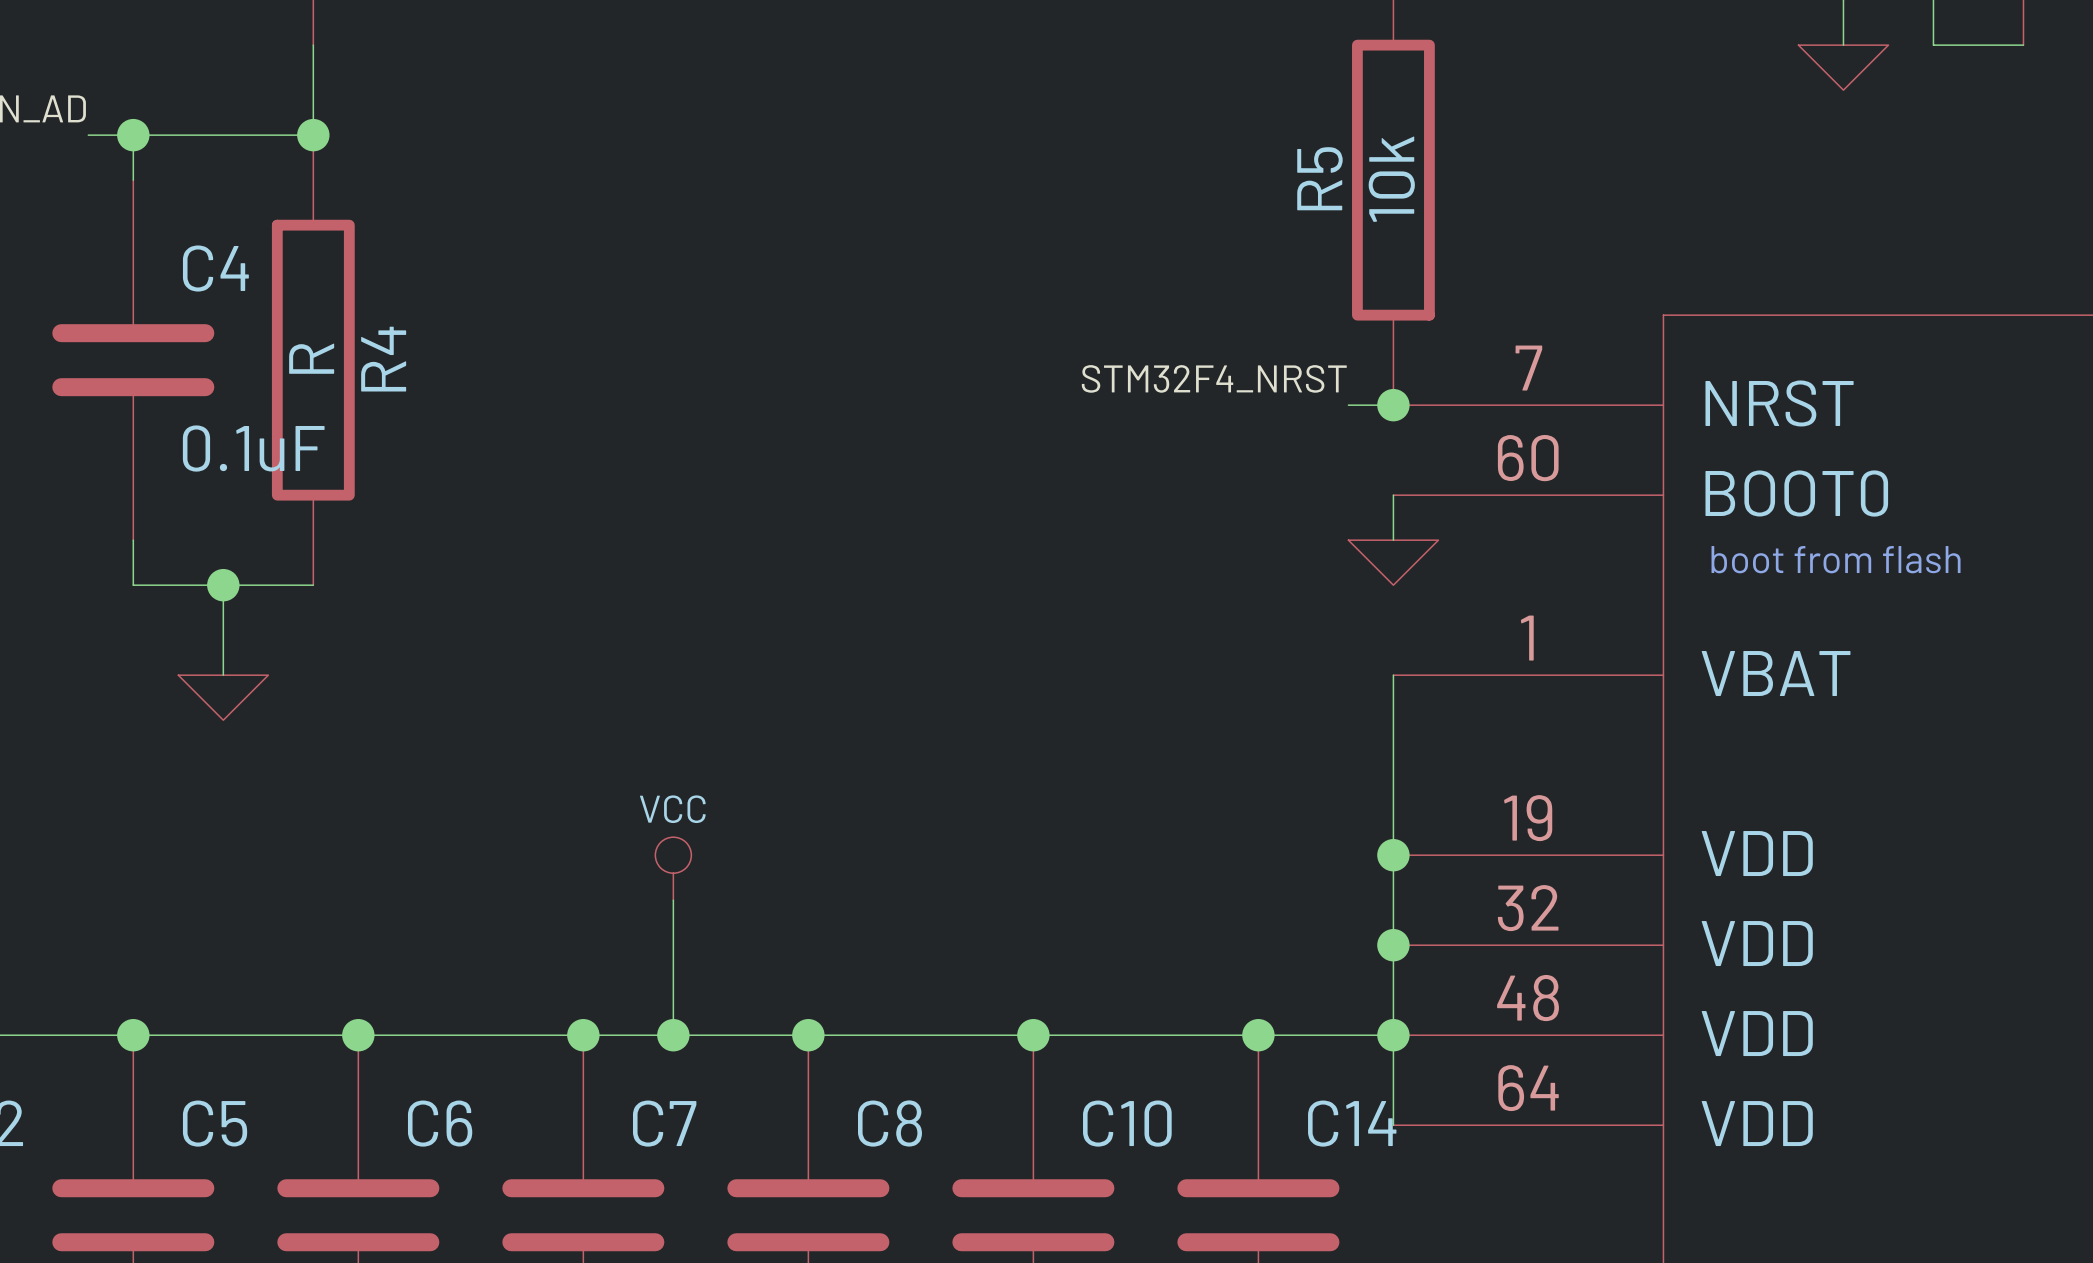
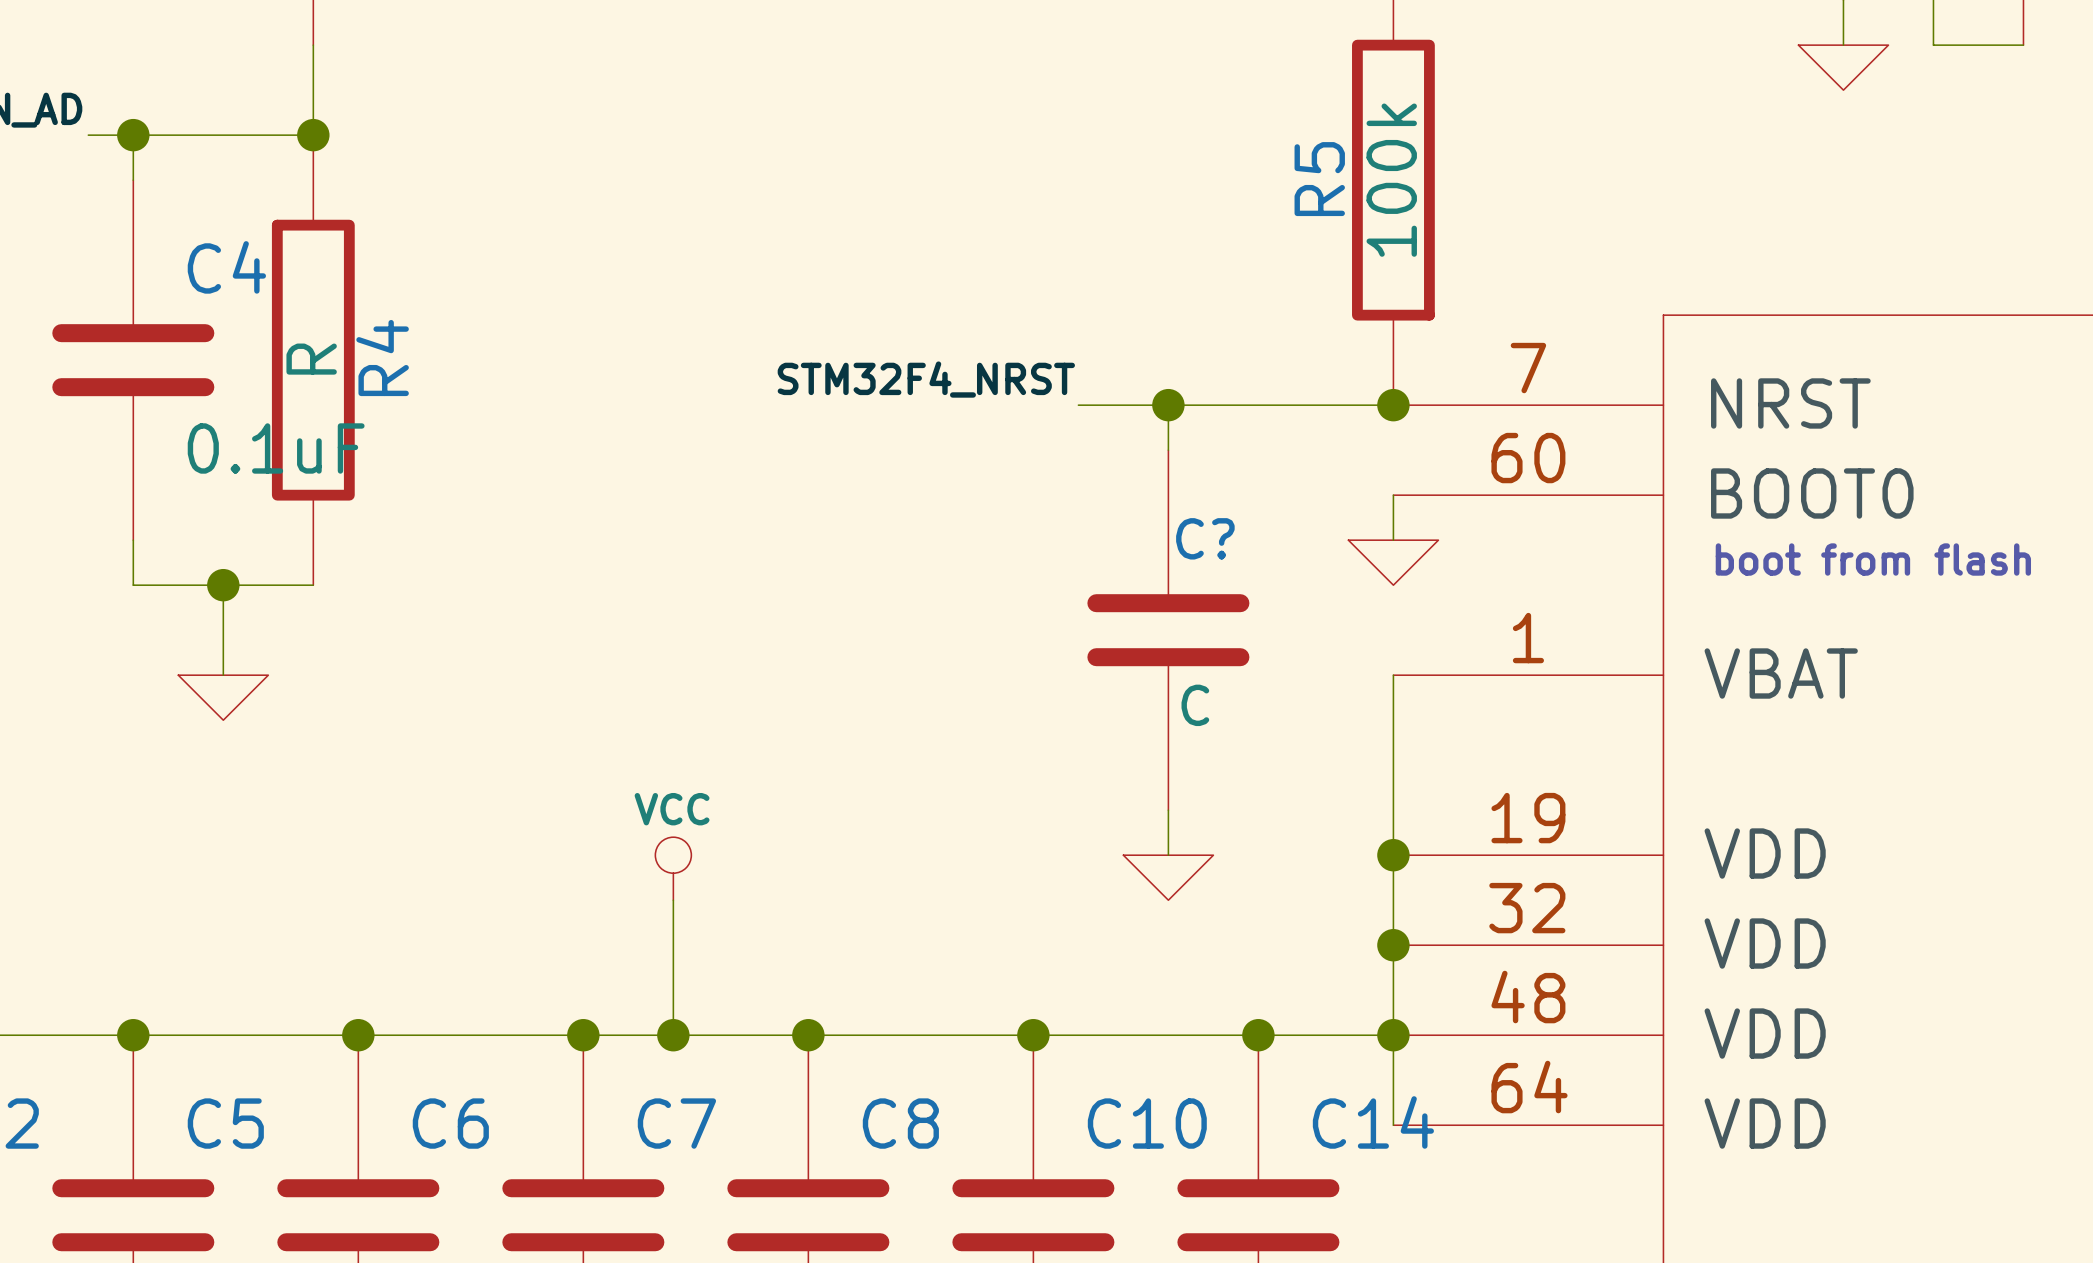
R5 value: 10k (1391, 179) -> 100k (1391, 180)
label position: STM32F4_NRST (1214, 378) -> STM32F4_NRST (926, 379)
wire: none -> (1078, 405) (1348, 405)
wire: none -> (1168, 405) (1168, 450)
junction: none -> (1168, 405)
C?: none -> C (1168, 630)
wire: none -> (1168, 810) (1168, 855)
power symbol: none -> (1168, 877)

